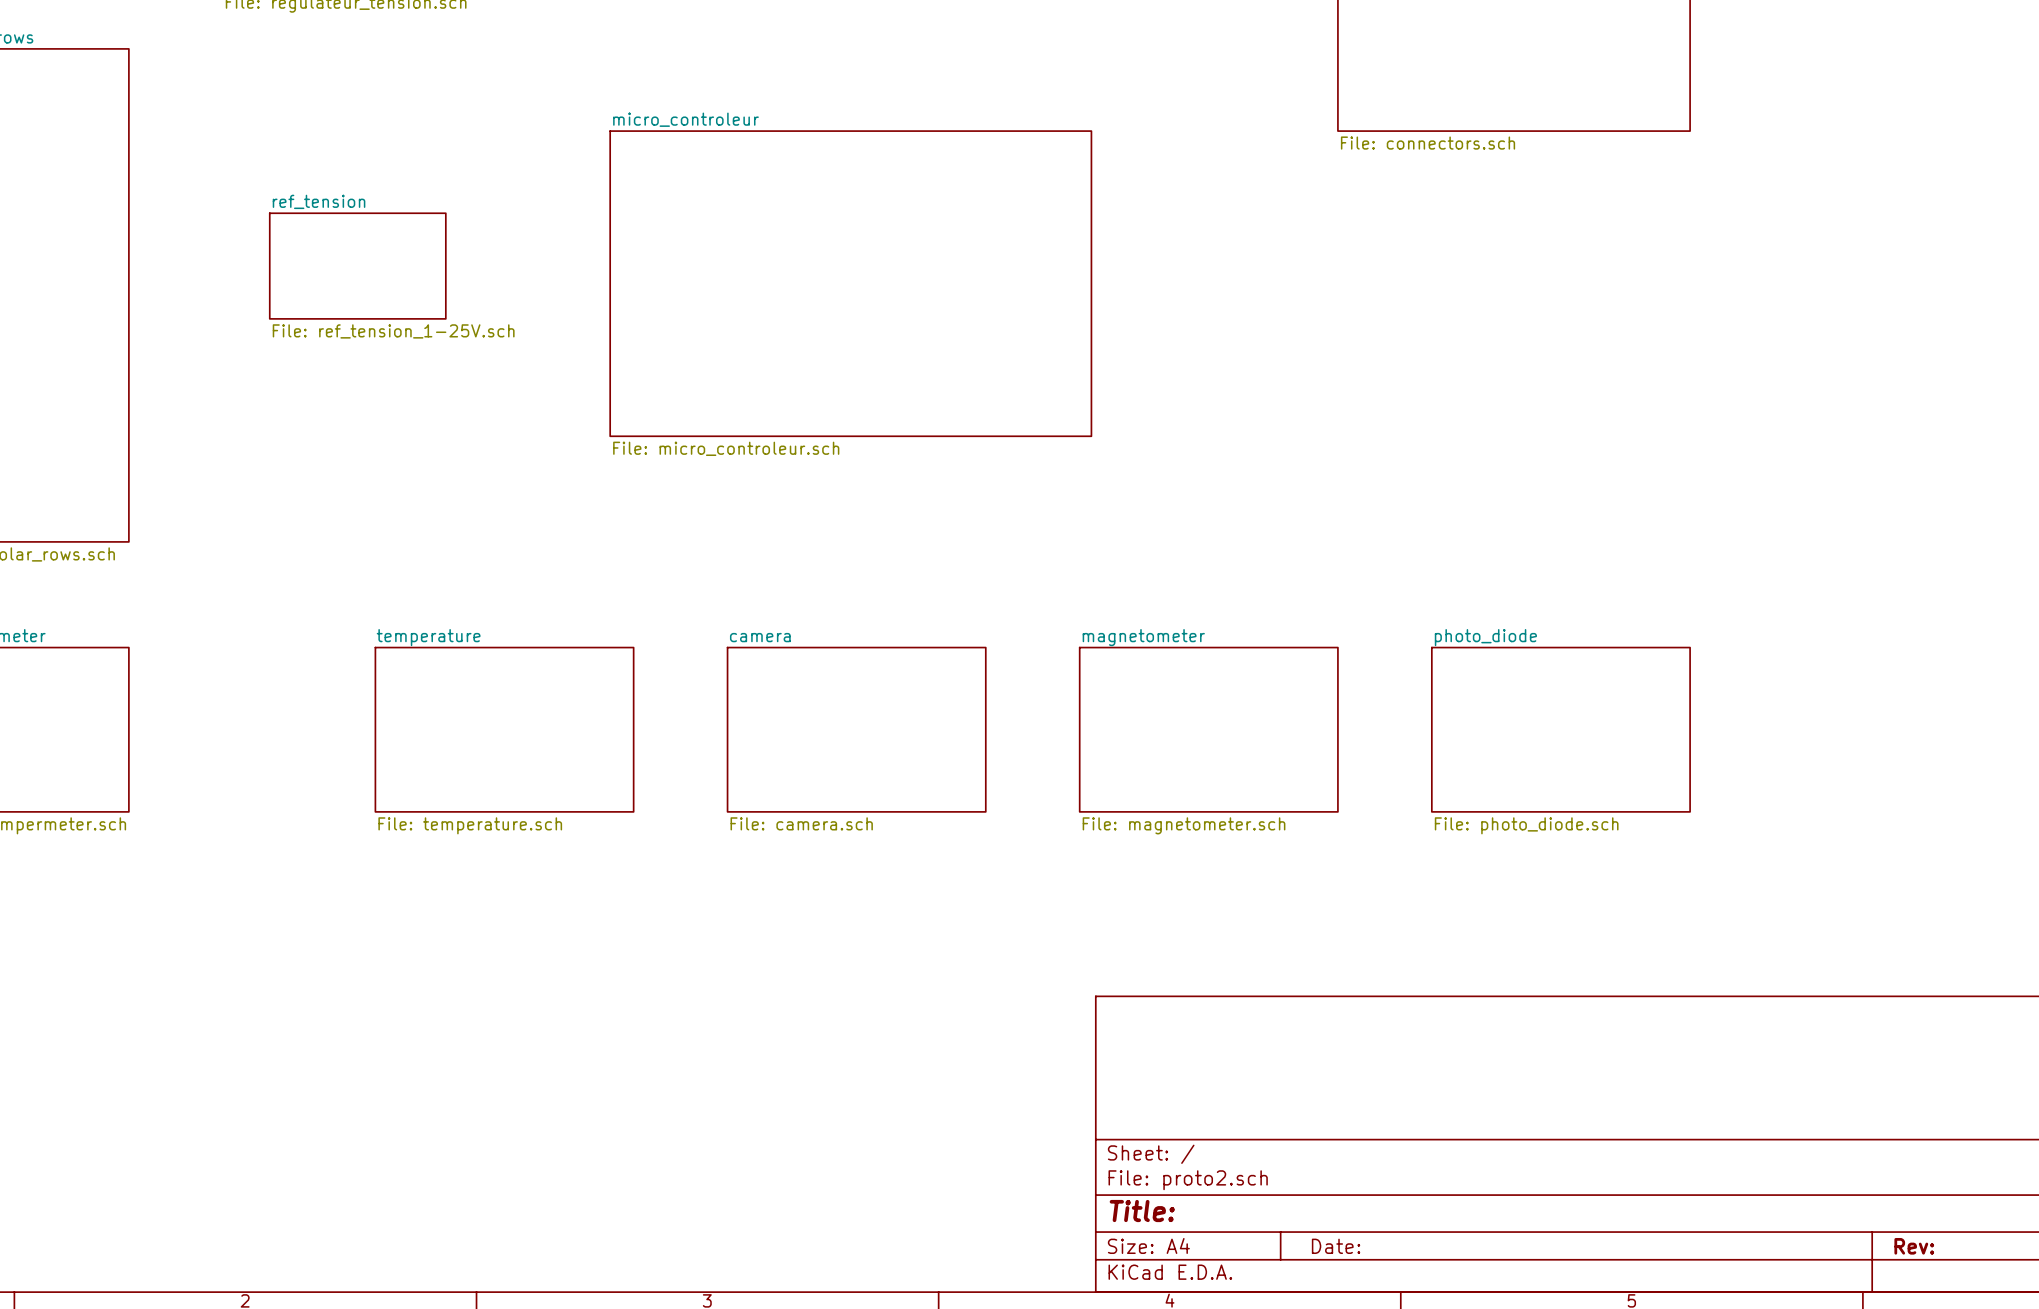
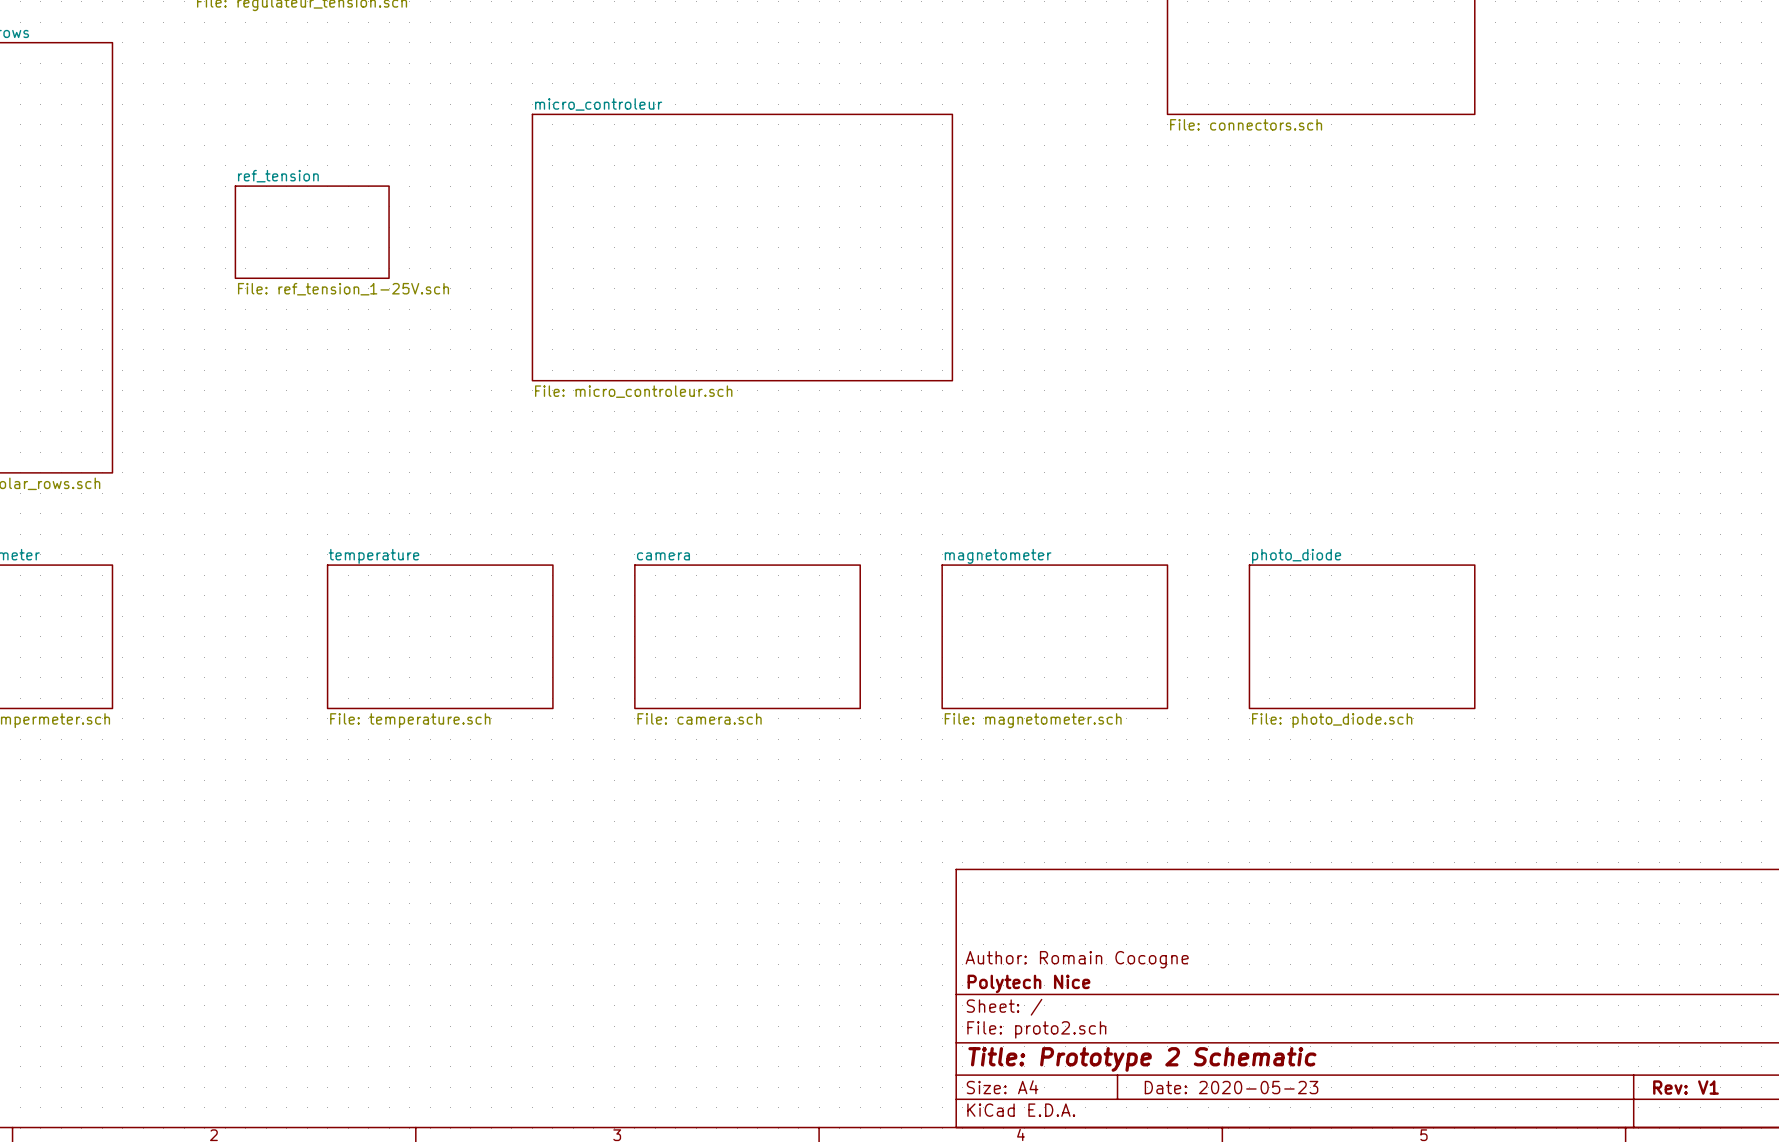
title block: none -> Author: Romain Cocogne (1077, 959)
title block: none -> Polytech Nice (1028, 983)
title block: Title: (1142, 1211) -> Title: Prototype 2 Schematic (1142, 1059)
title block: Date: (1336, 1246) -> Date: 2020-05-23 (1231, 1087)
title block: Rev: (1914, 1246) -> Rev: V1 (1685, 1087)

